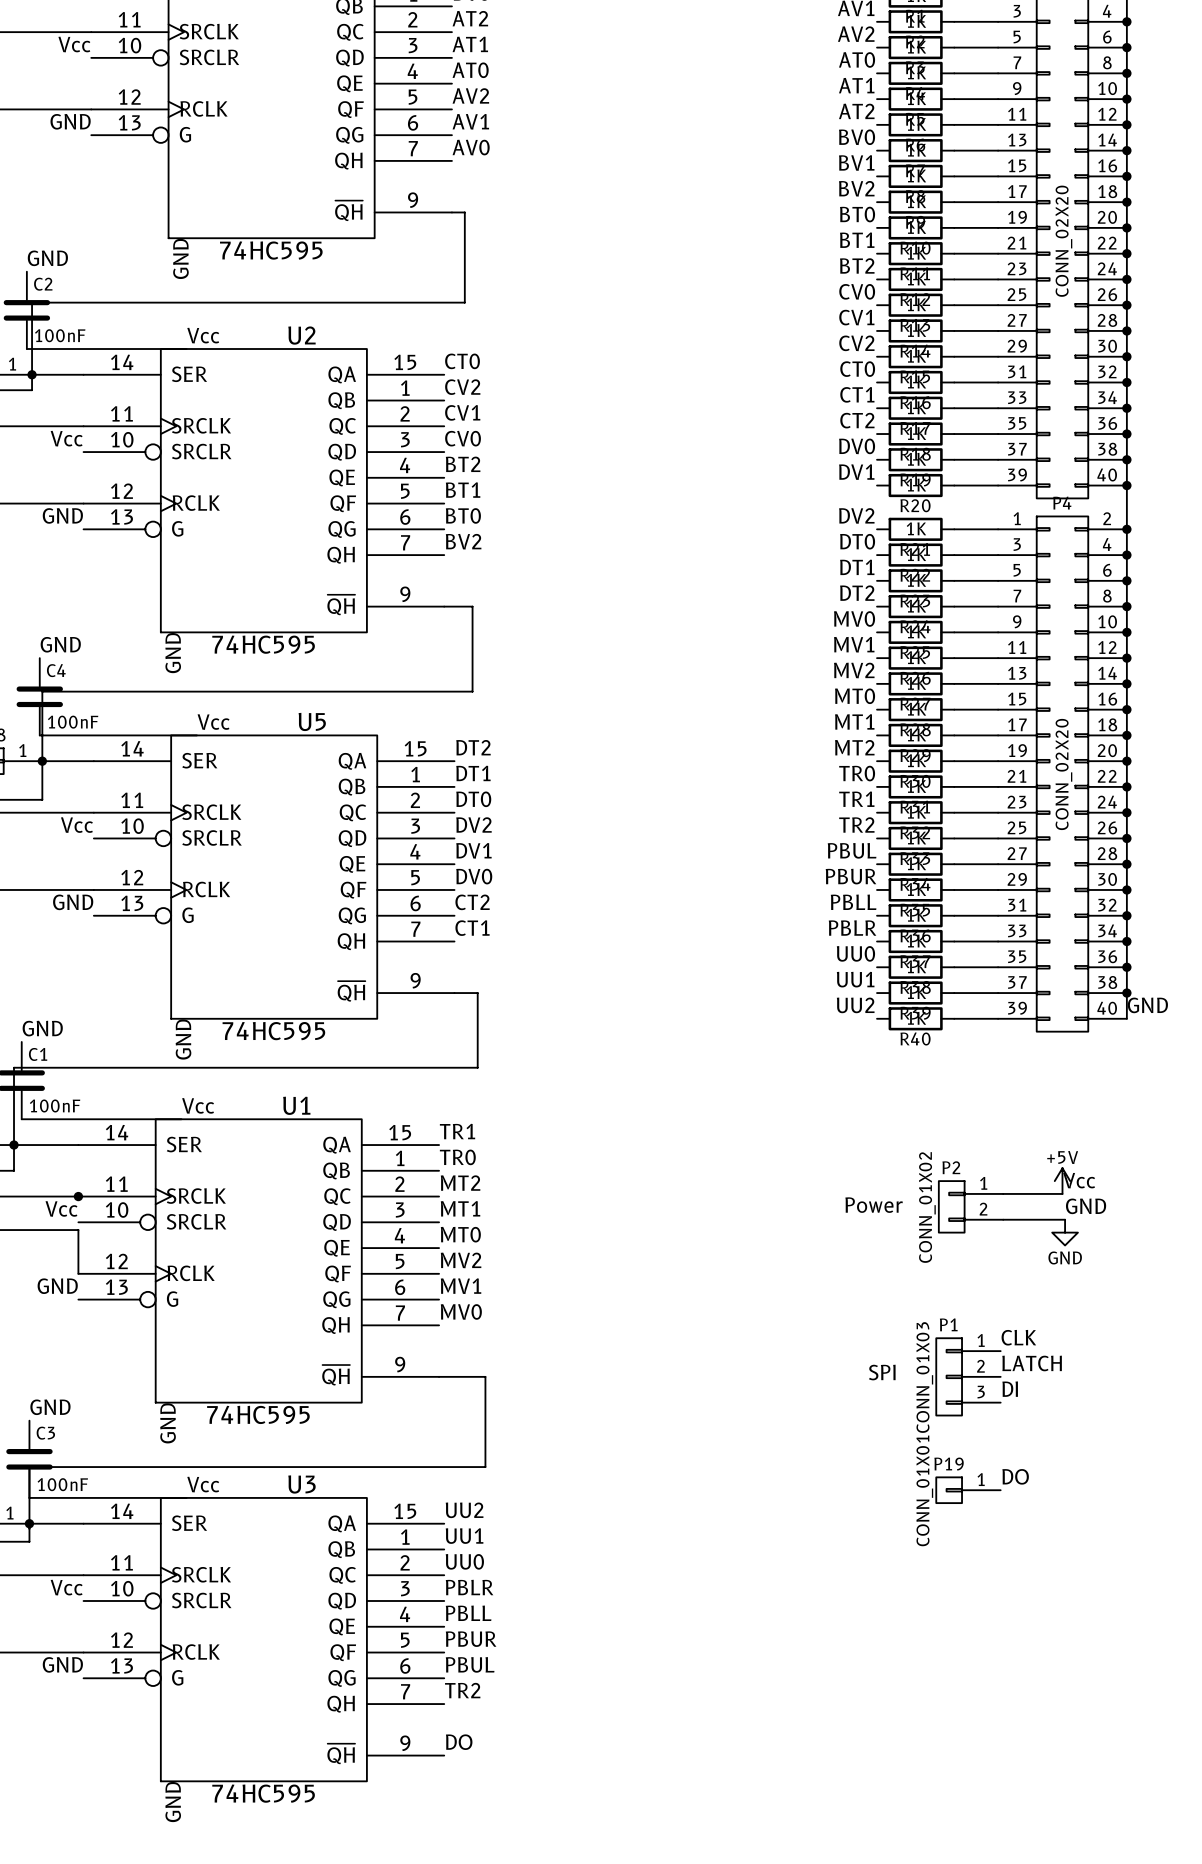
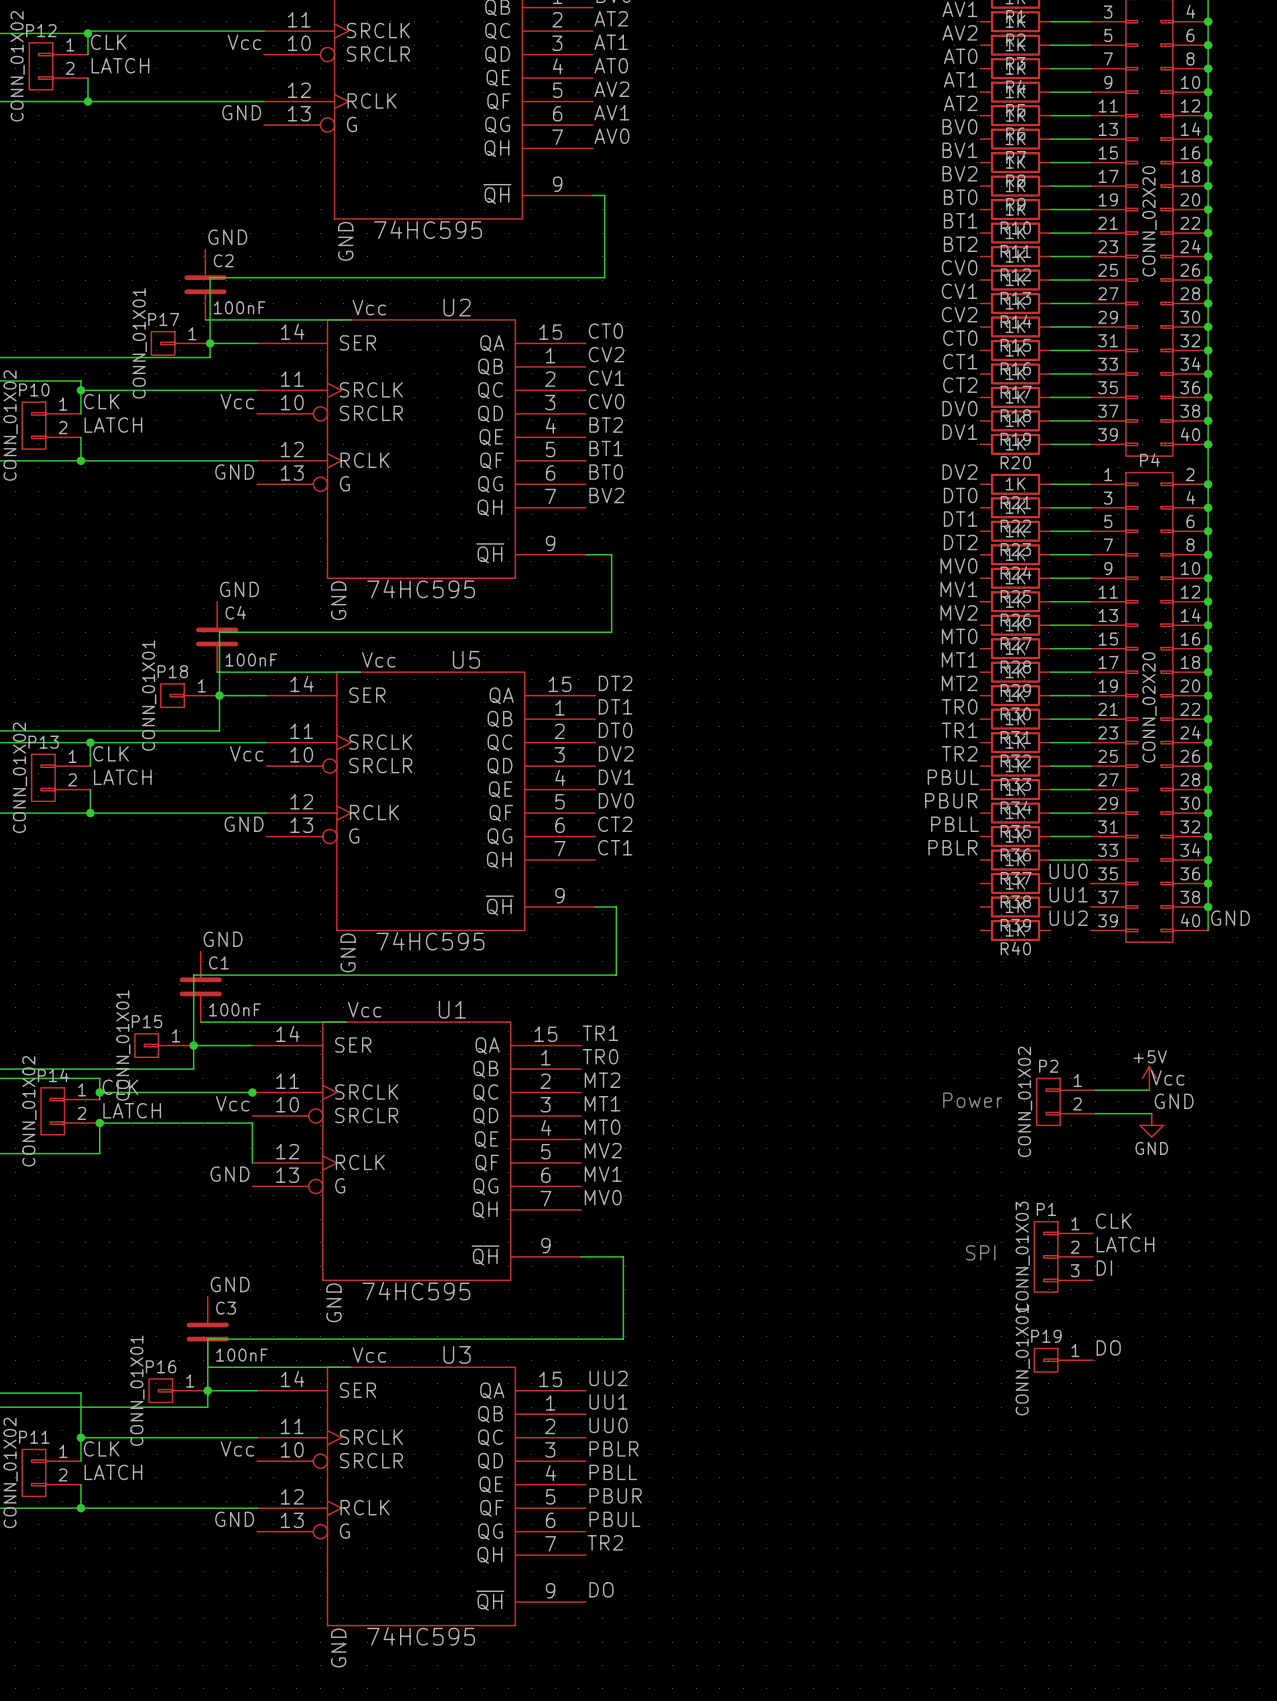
label position: UU0 (855, 953) -> UU0 (1068, 871)
wire: (954, 967) (998, 967) -> none
label position: UU1 (855, 979) -> UU1 (1068, 894)
wire: (954, 993) (998, 993) -> none
label position: UU2 (855, 1005) -> UU2 (1068, 918)
wire: (954, 1018) (998, 1018) -> none

